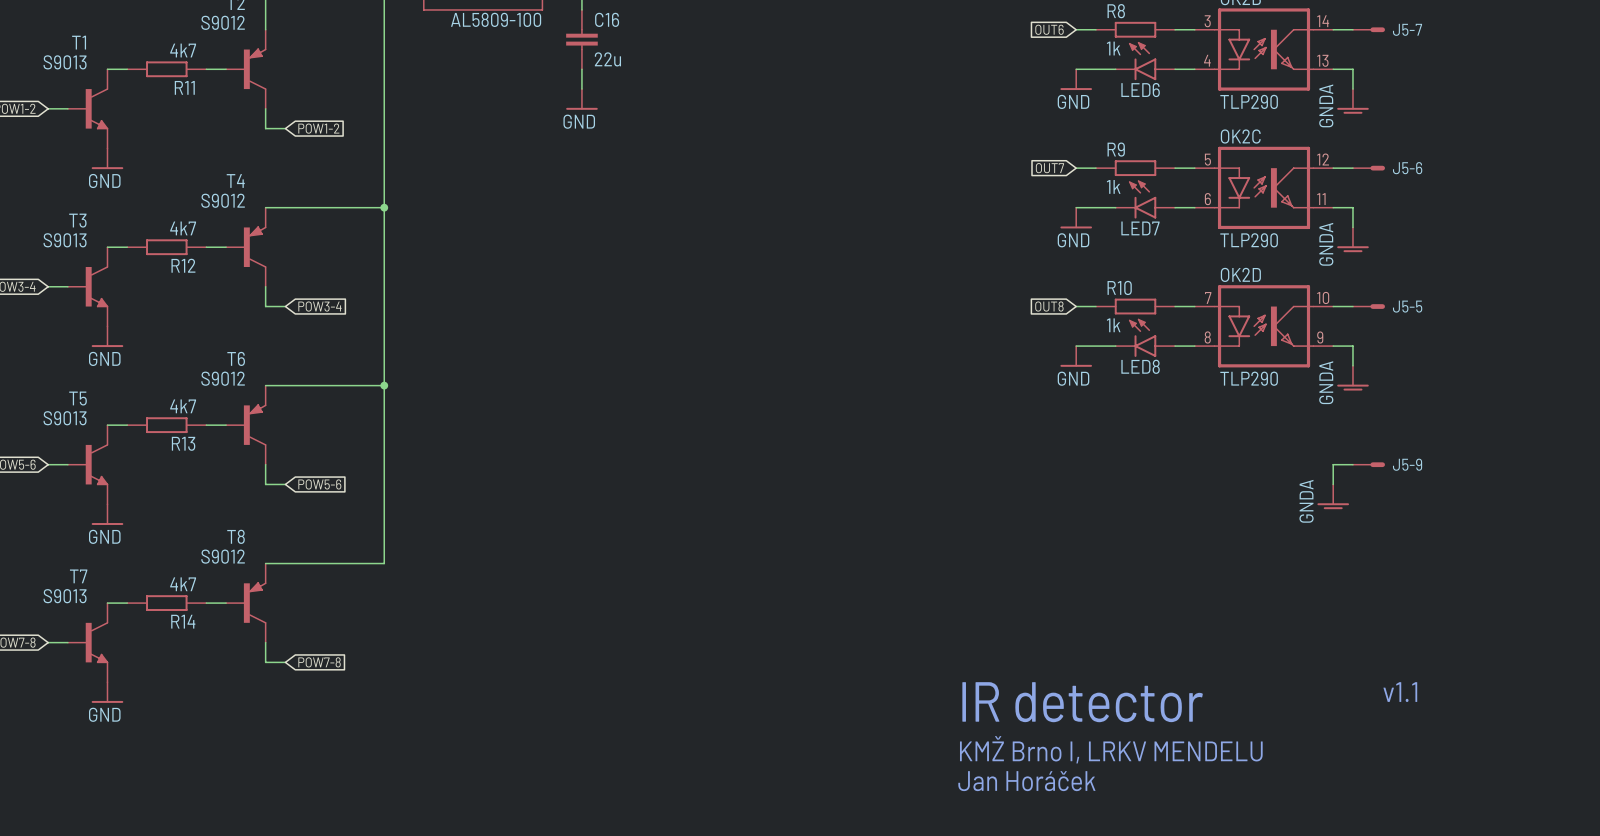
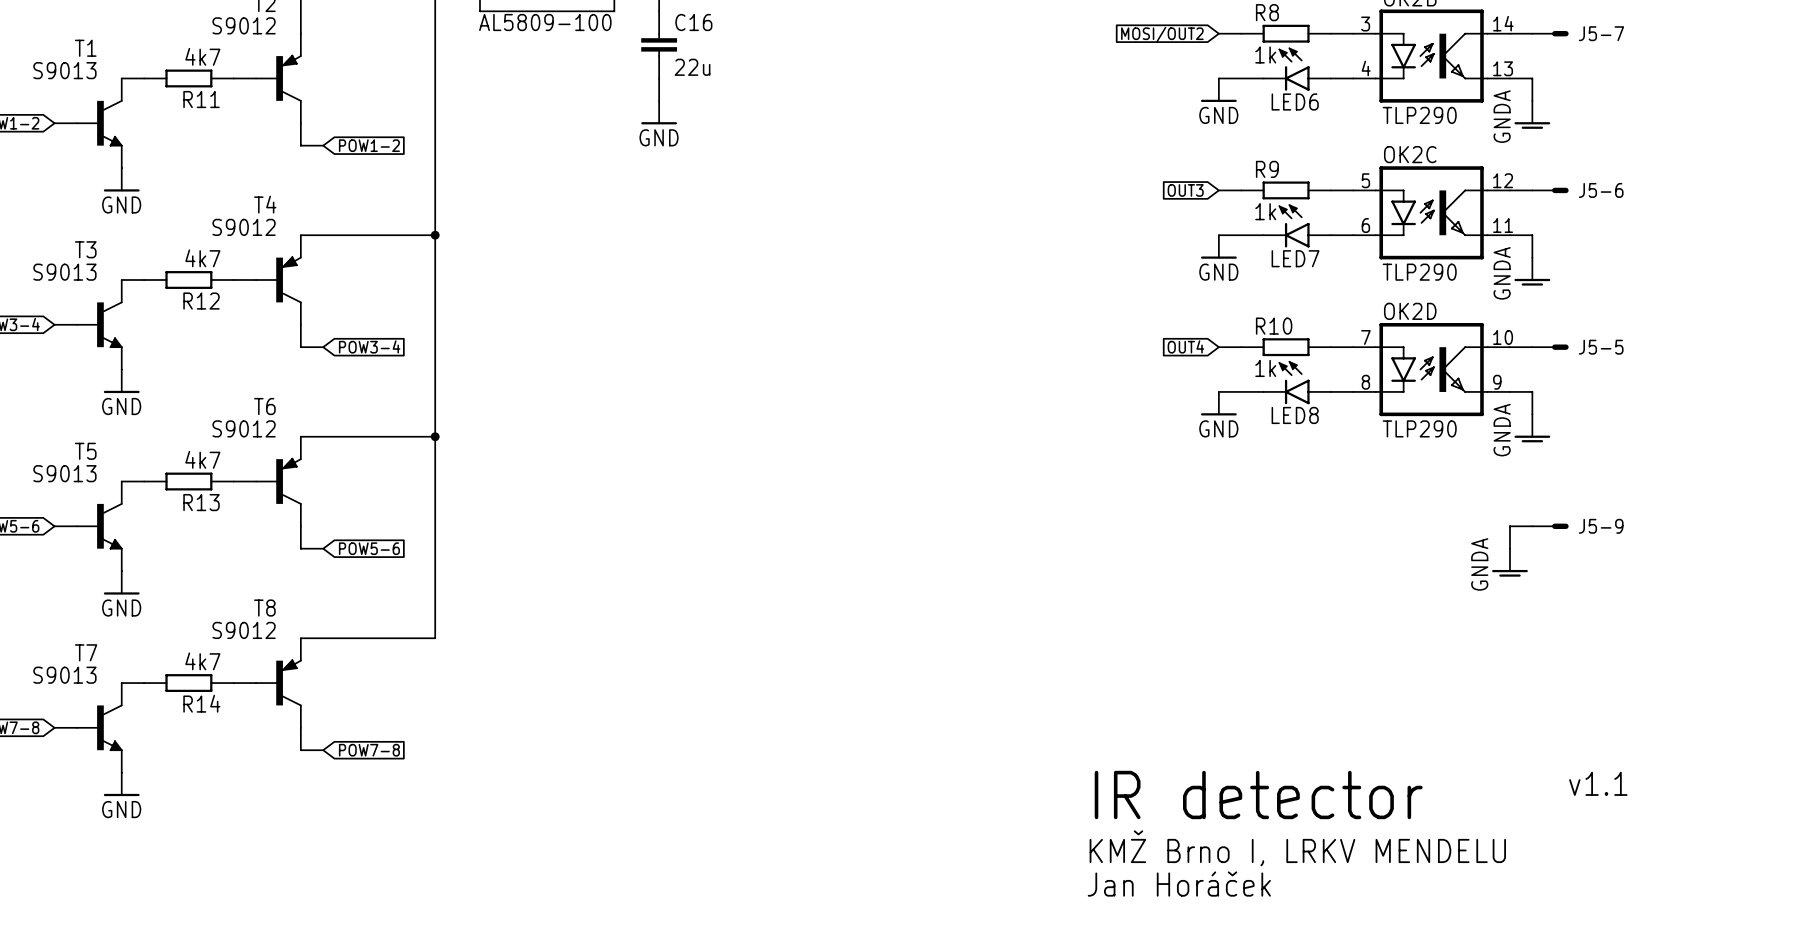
global label: OUT6 (1049, 29) -> MOSI/OUT2 (1162, 34)
global label: OUT7 (1049, 168) -> OUT3 (1185, 190)
global label: OUT8 (1049, 306) -> OUT4 (1185, 346)

